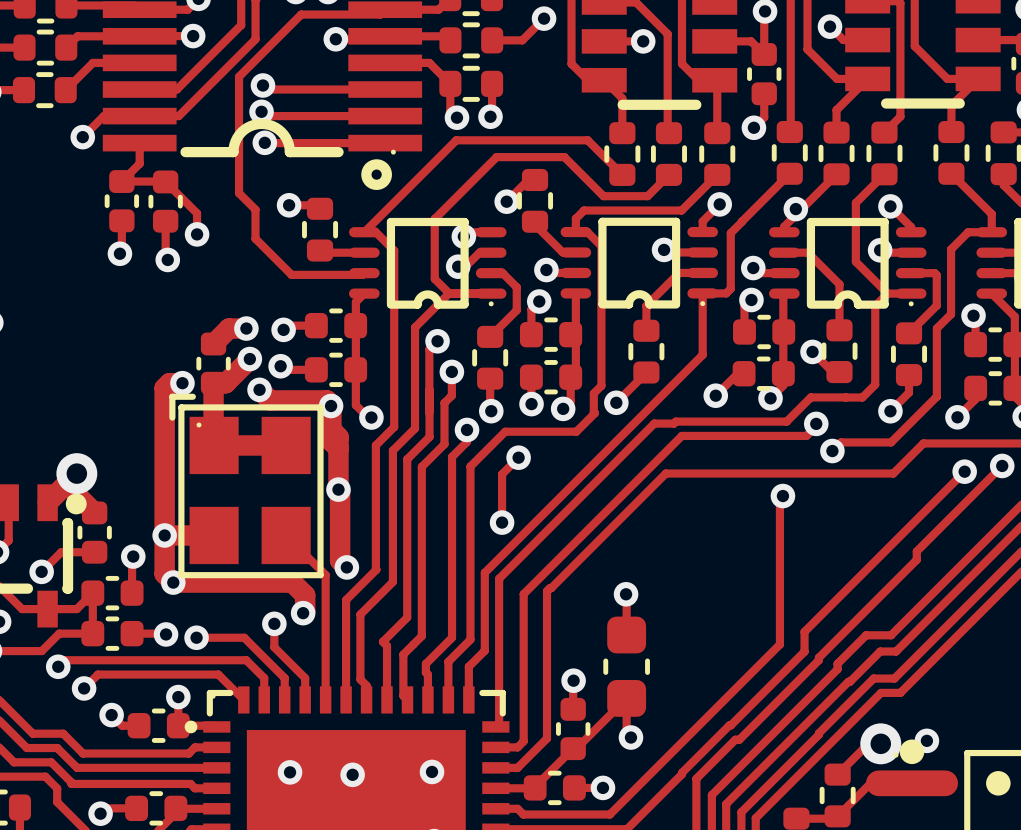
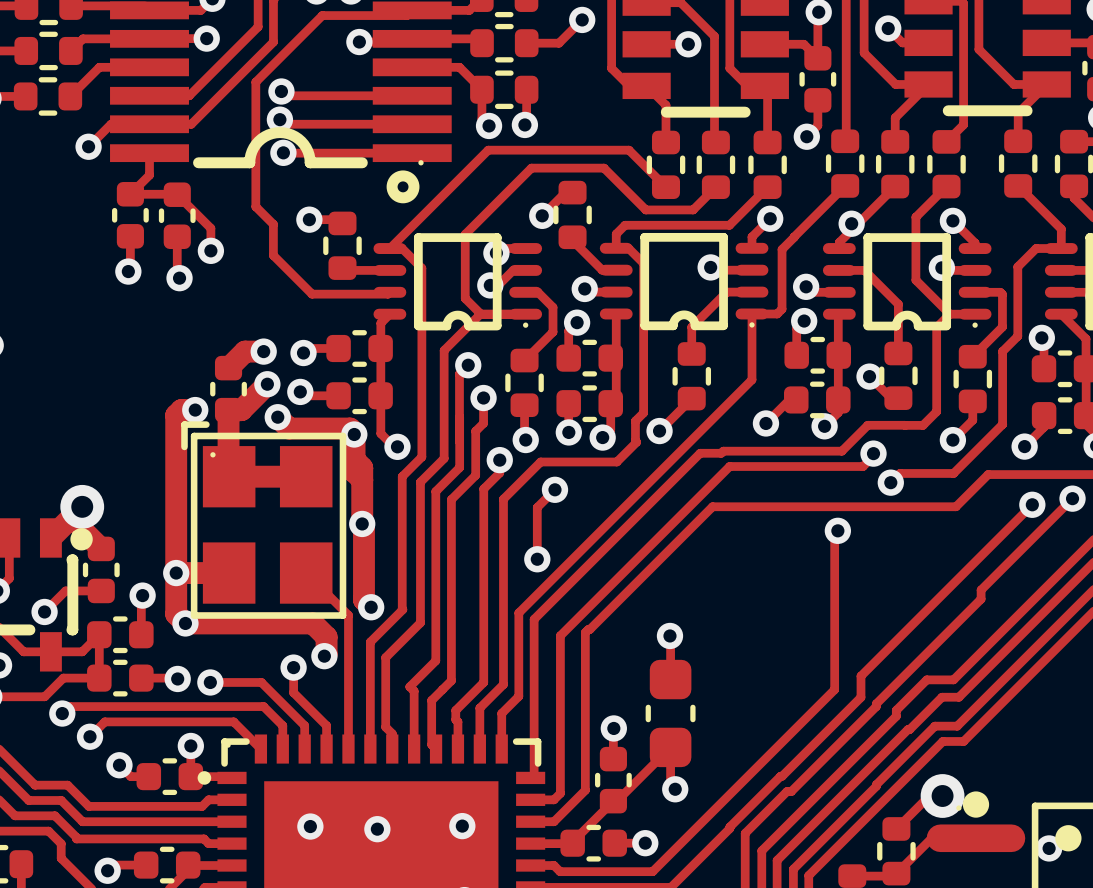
via: (926, 740) -> none
via: none -> (1049, 848)

